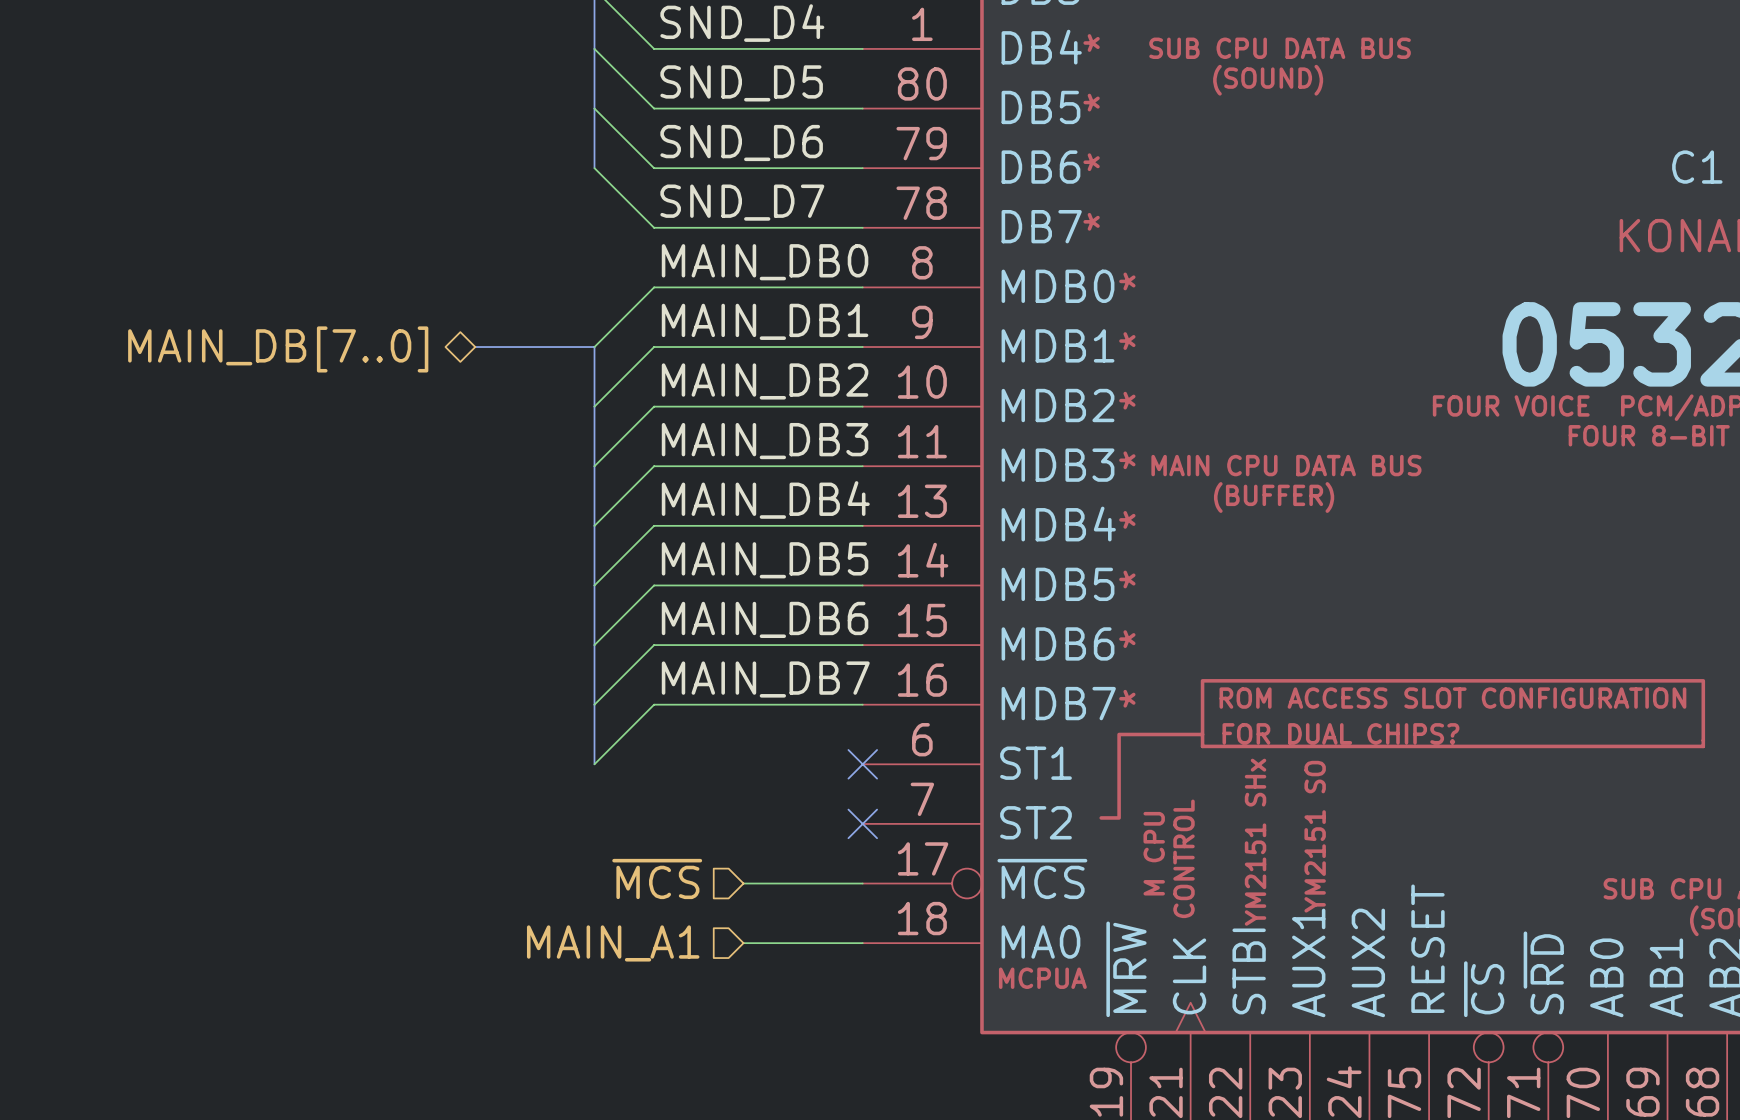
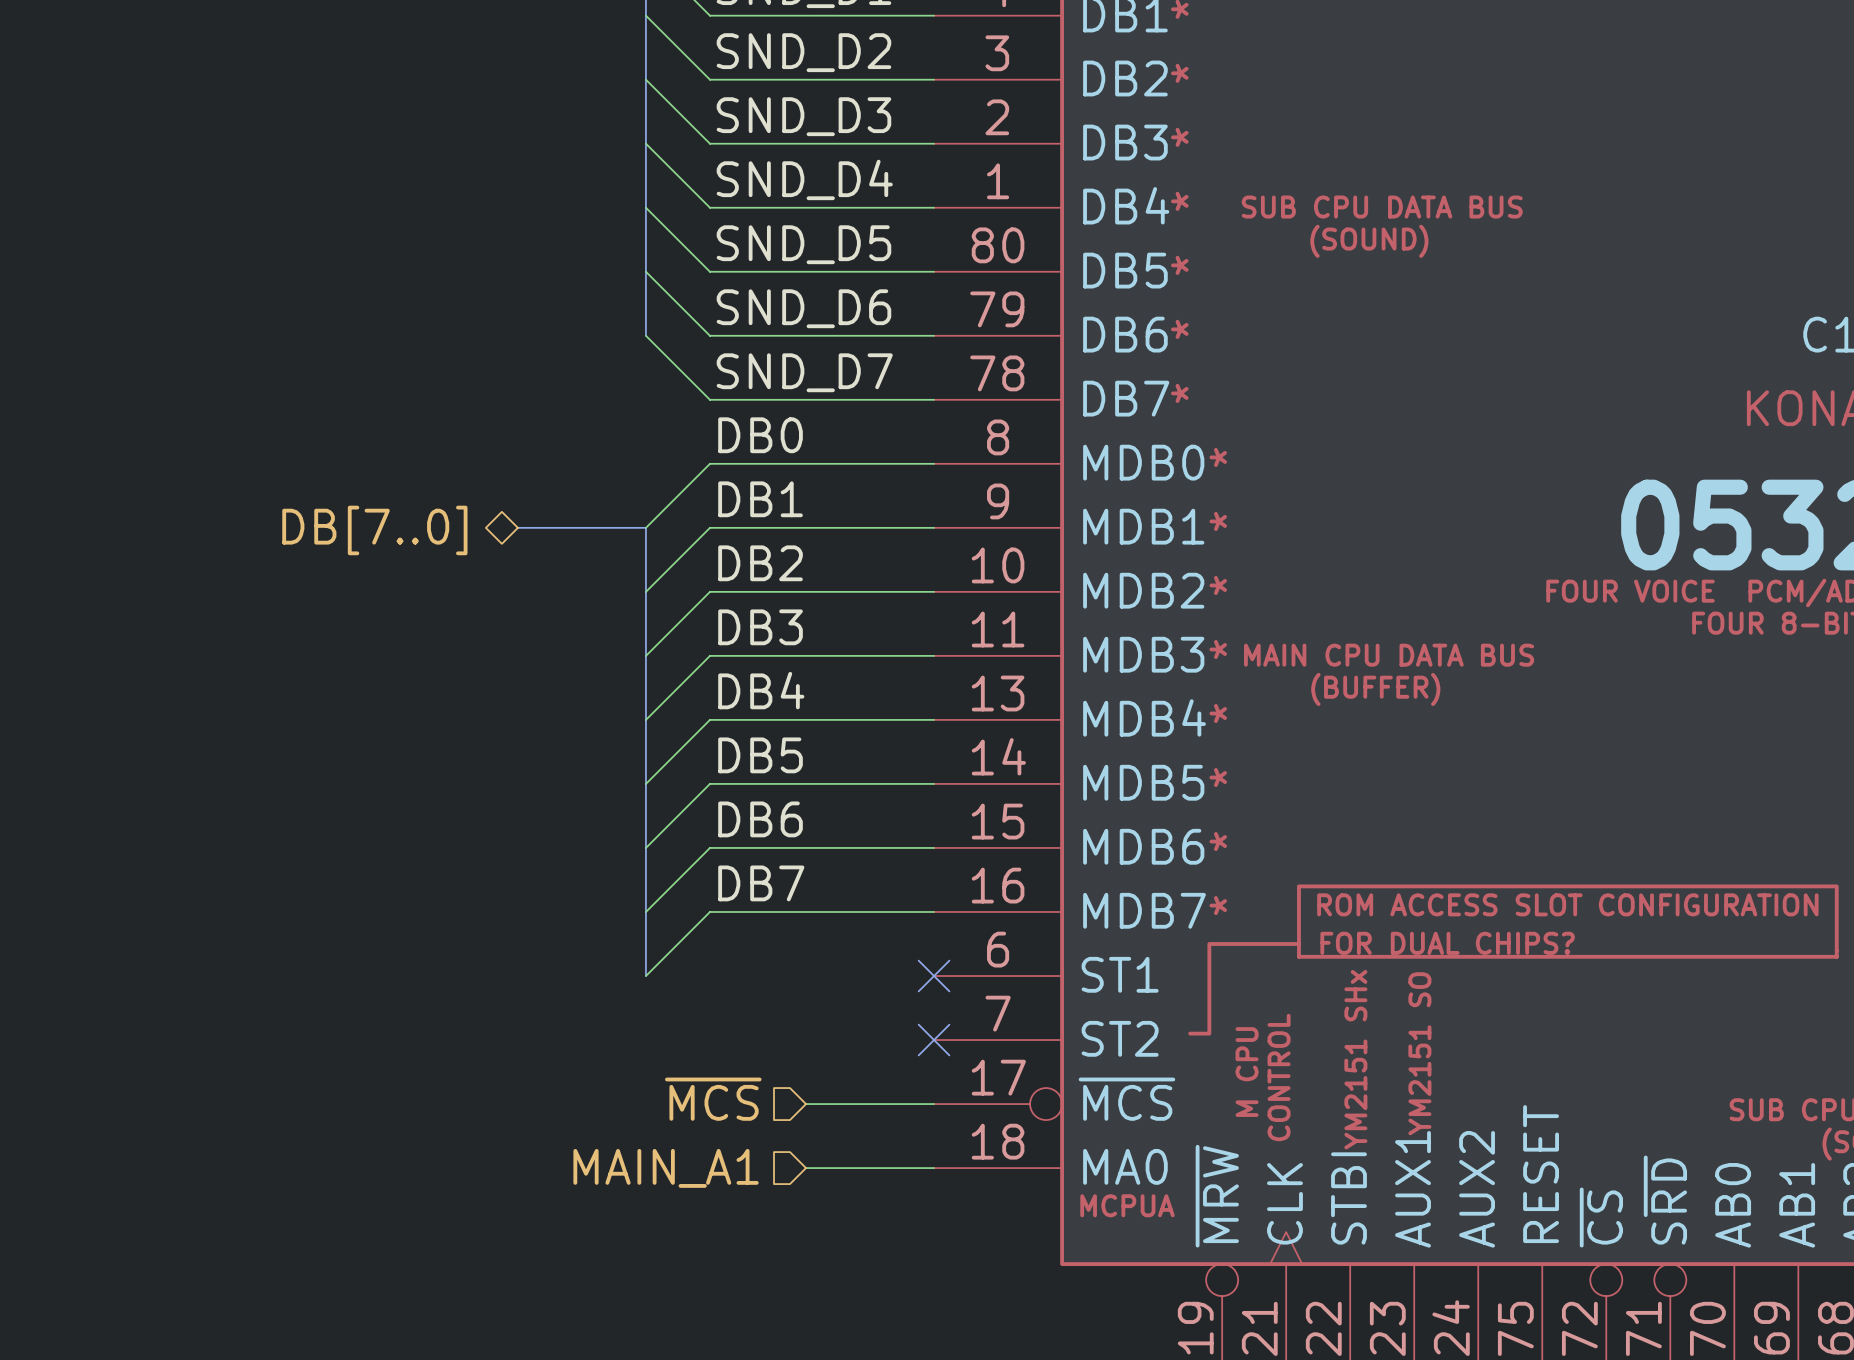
label: MAIN_DB0 (765, 262) -> DB0 (760, 435)
label: MAIN_DB1 (765, 321) -> DB1 (760, 499)
hierarchical label: MAIN_DB[7..0] (278, 349) -> DB[7..0] (374, 530)
label: MAIN_DB2 (765, 381) -> DB2 (760, 563)
label: MAIN_DB3 (765, 441) -> DB3 (760, 627)
label: MAIN_DB4 (765, 499) -> DB4 (761, 690)
label: MAIN_DB5 (765, 560) -> DB5 (760, 755)
label: MAIN_DB6 (765, 619) -> DB6 (760, 819)
label: MAIN_DB7 (765, 679) -> DB7 (761, 883)

